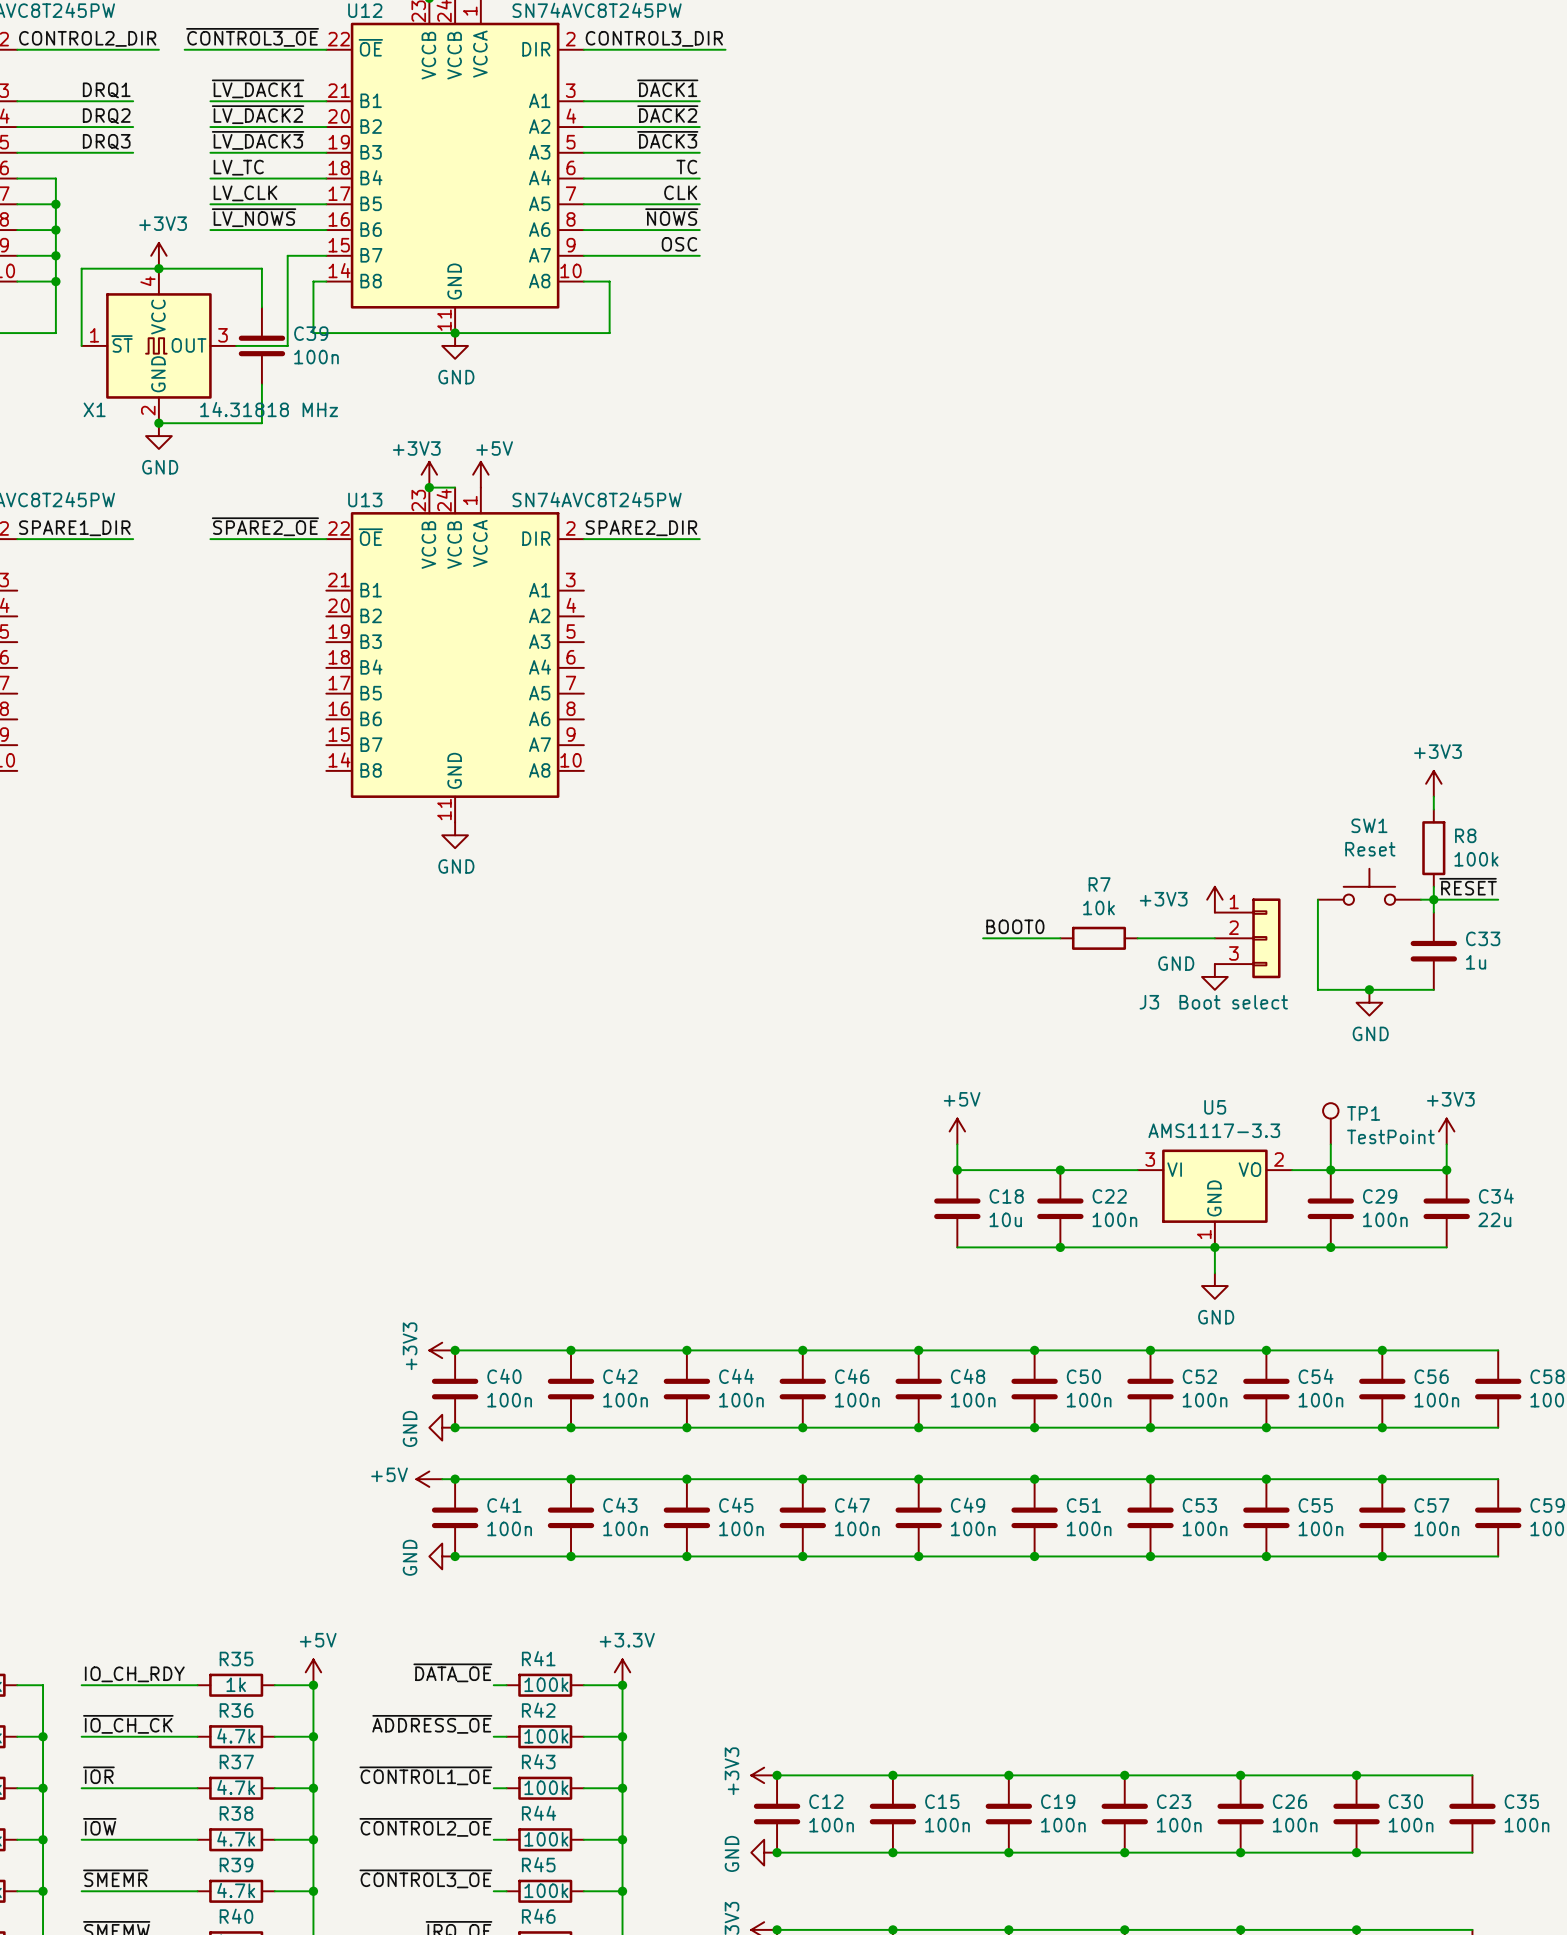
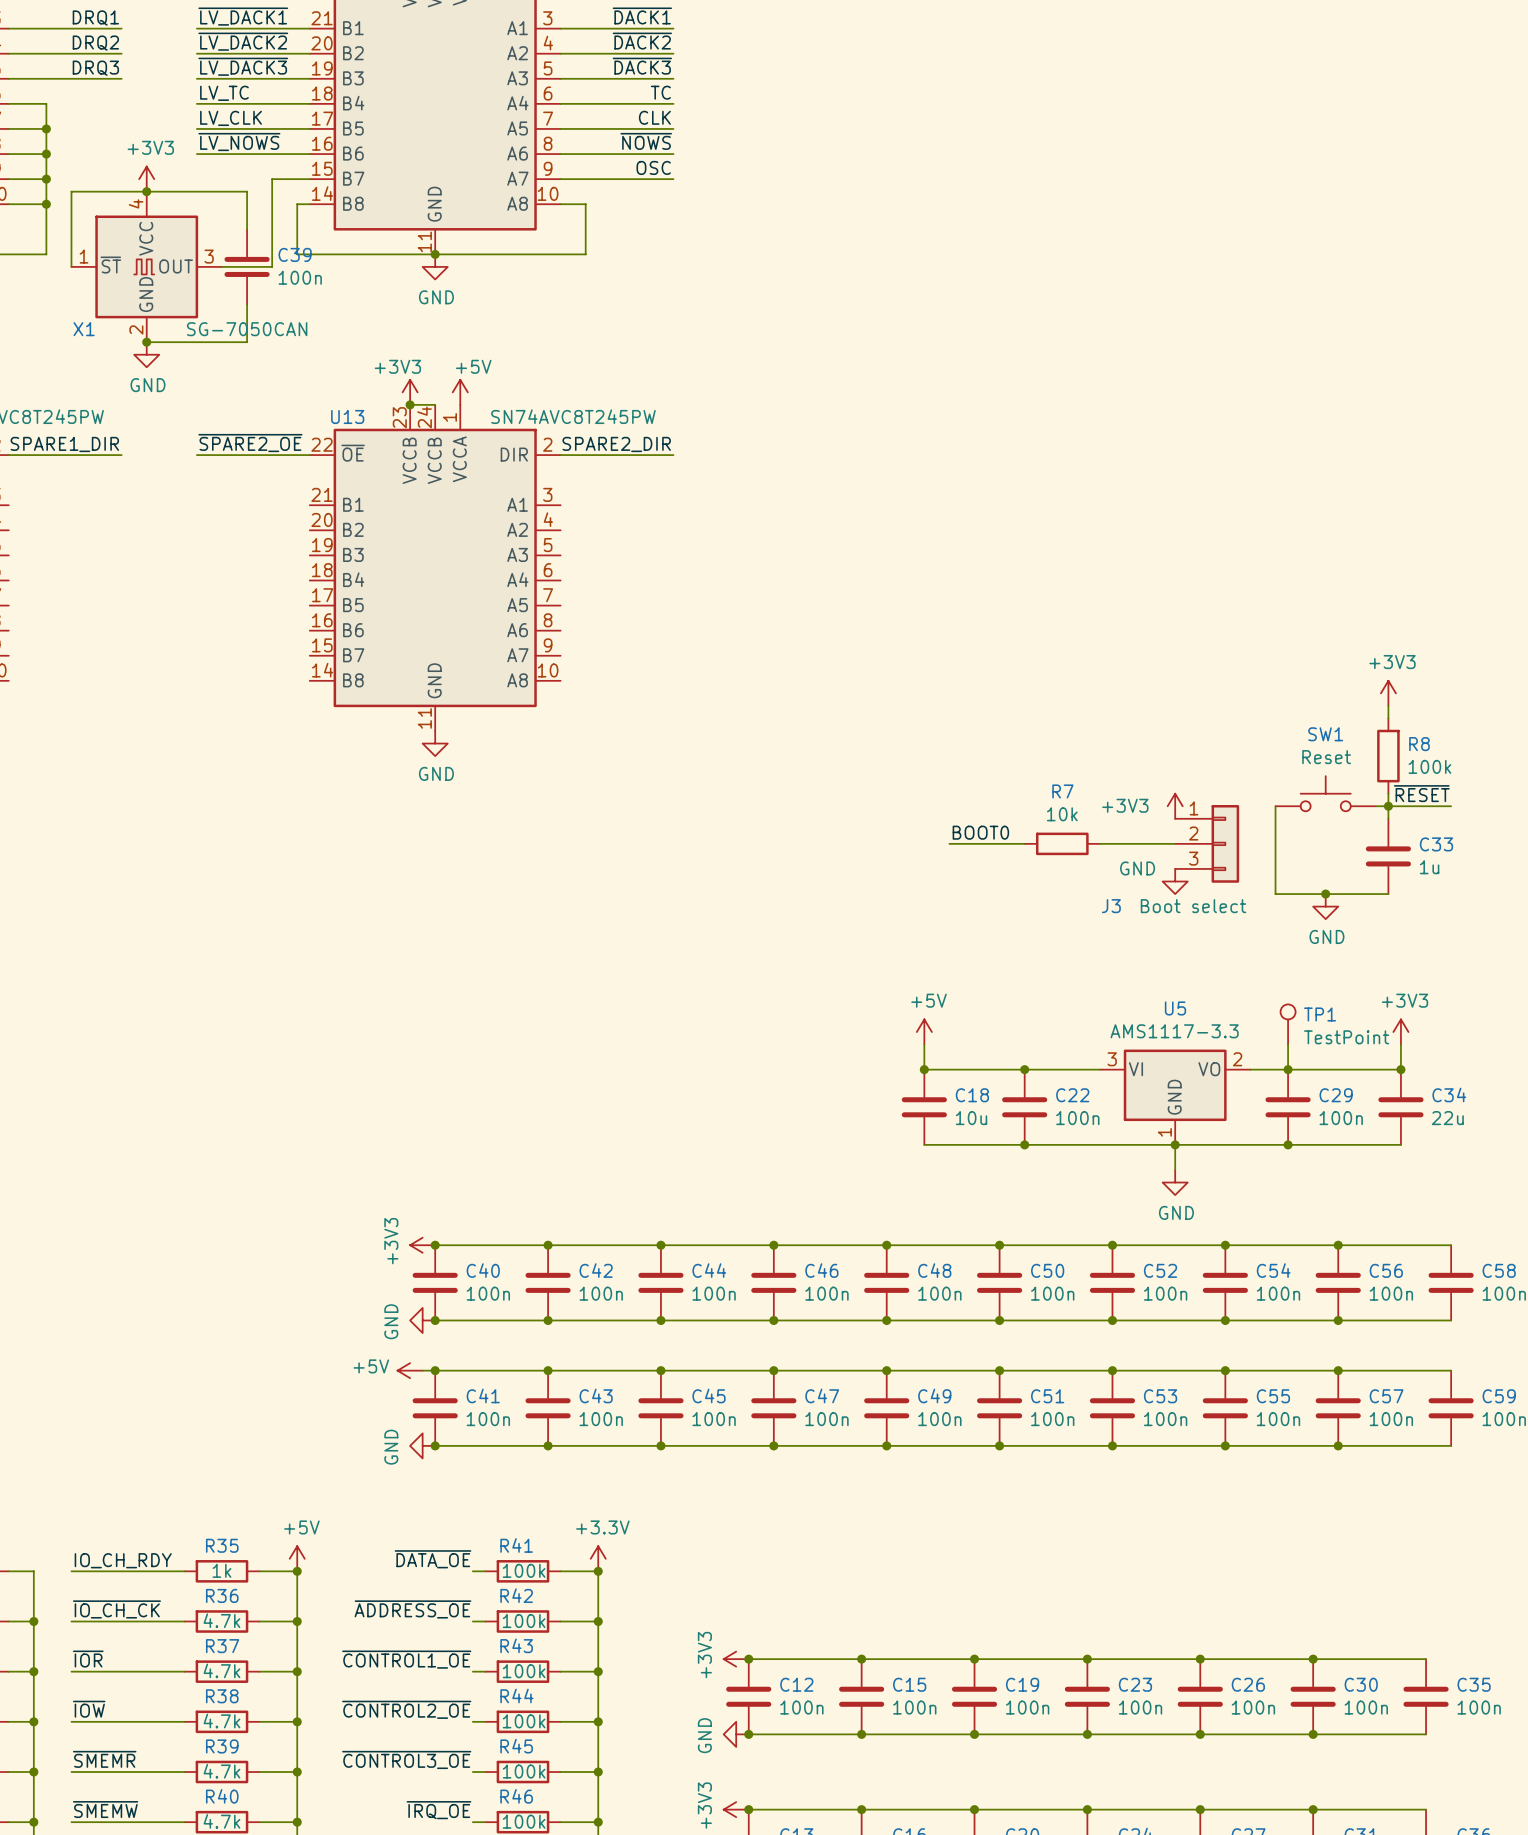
X1 value: 14.31818 MHz (269, 409) -> SG-7050CAN (247, 329)

